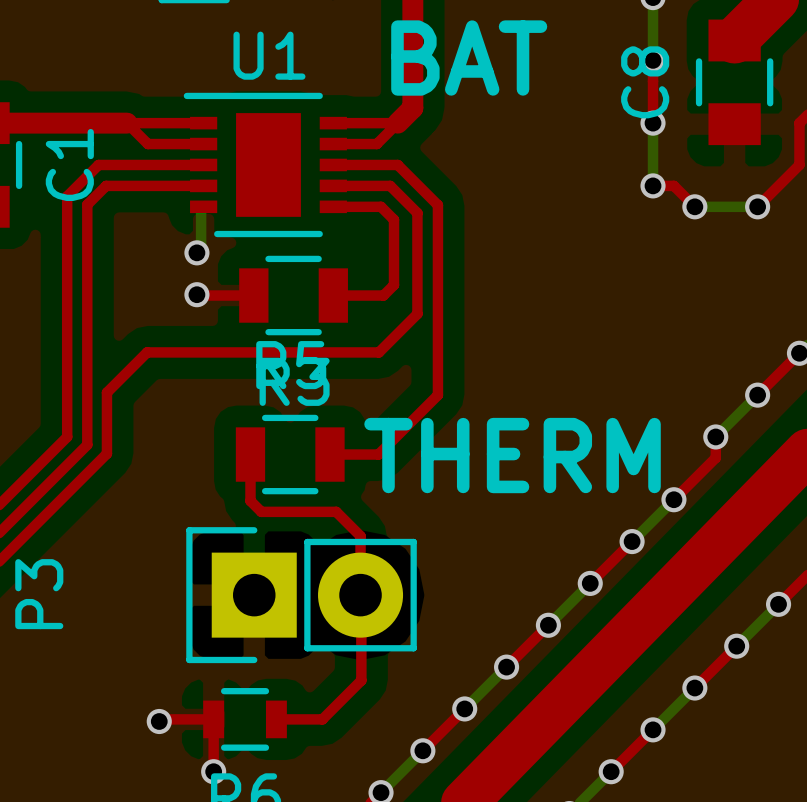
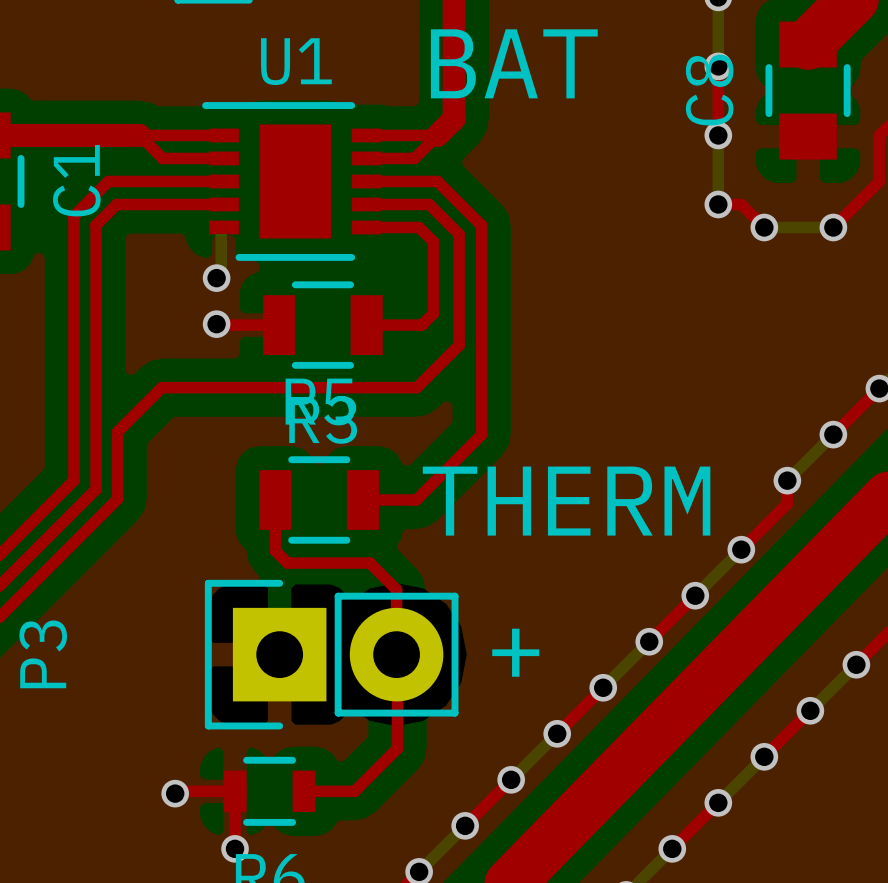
text: none -> + (515, 652)

